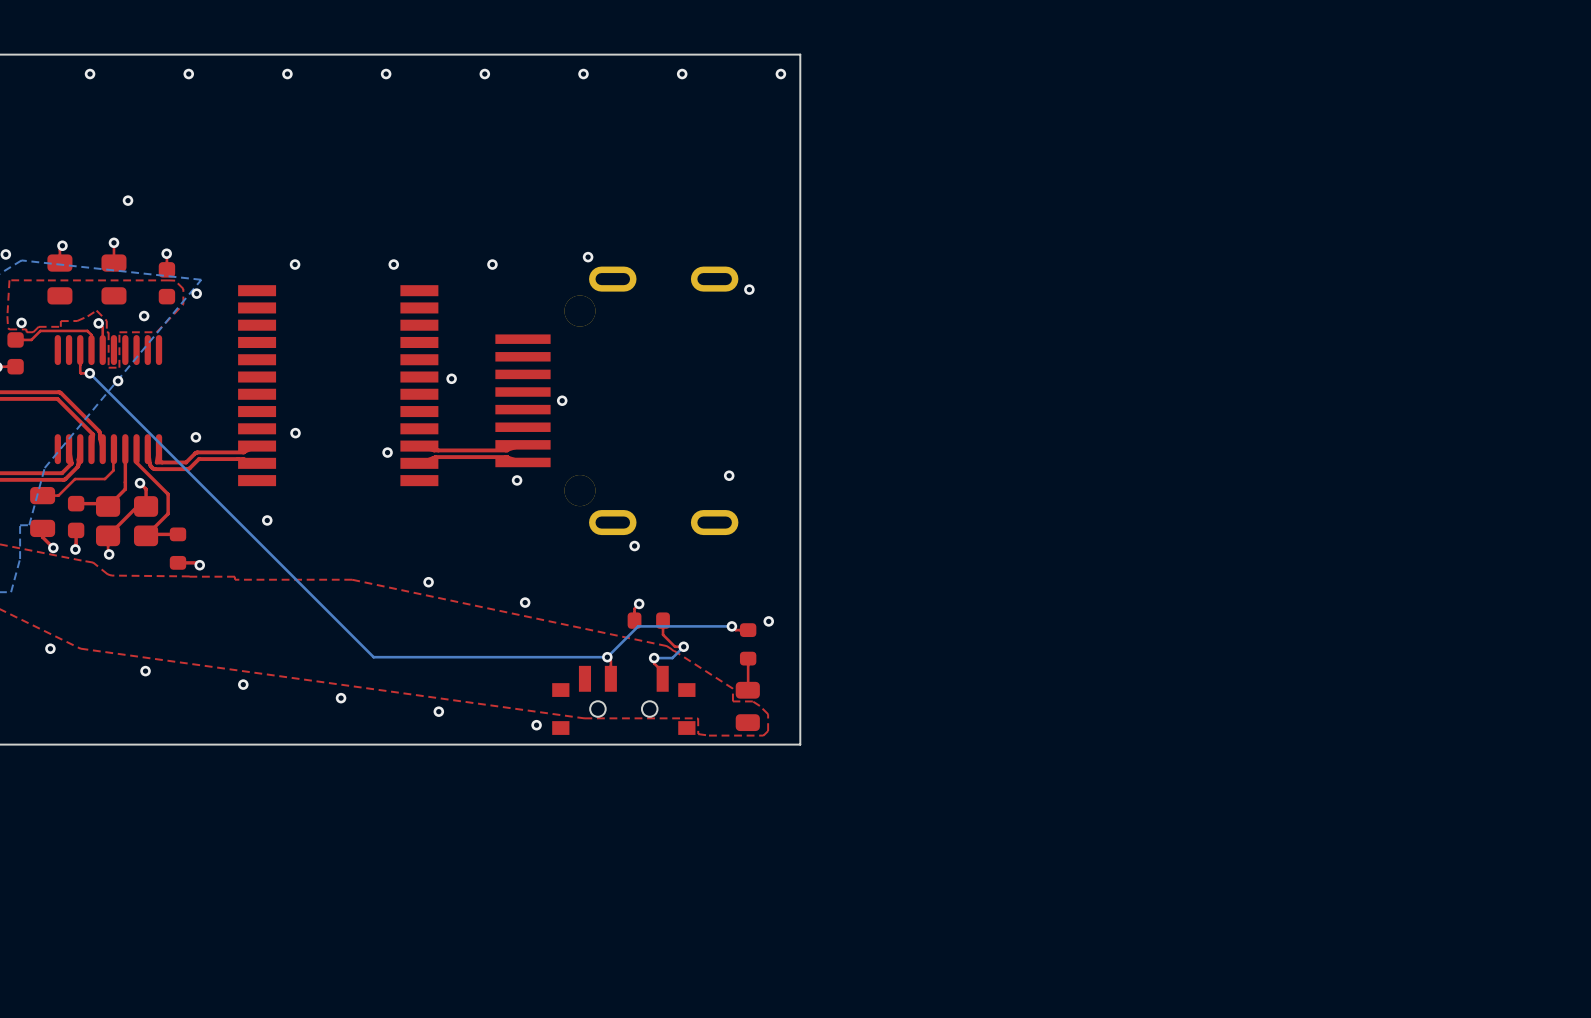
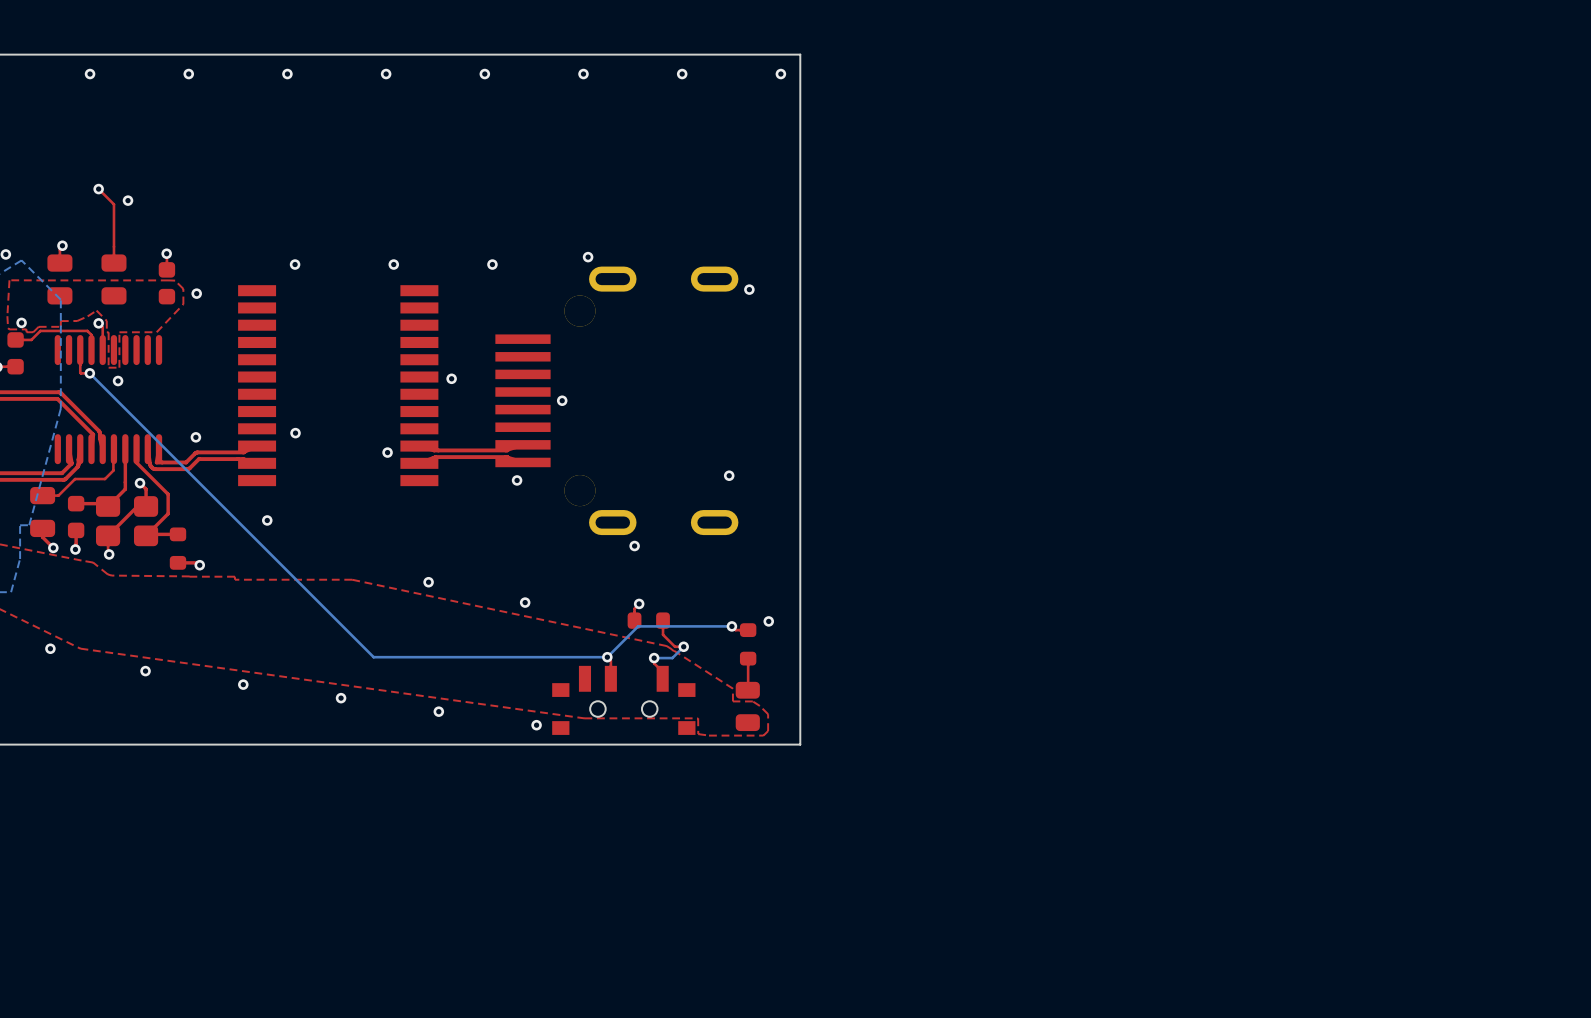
top track: none -> (98, 189) (113, 204) (113, 242)
via position: (113, 242) -> (98, 189)
bottom zone outline: (21, 260) (201, 279) (44, 468) -> (21, 260) (60, 299) (60, 408) (44, 468)
via: (144, 316) -> none

